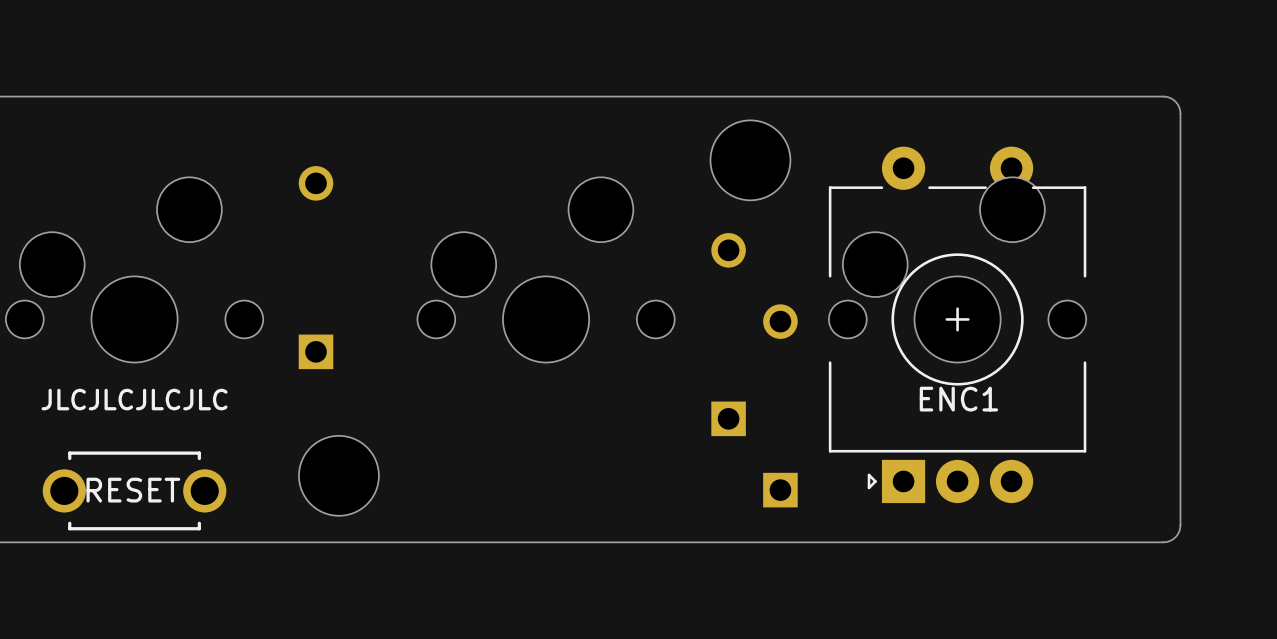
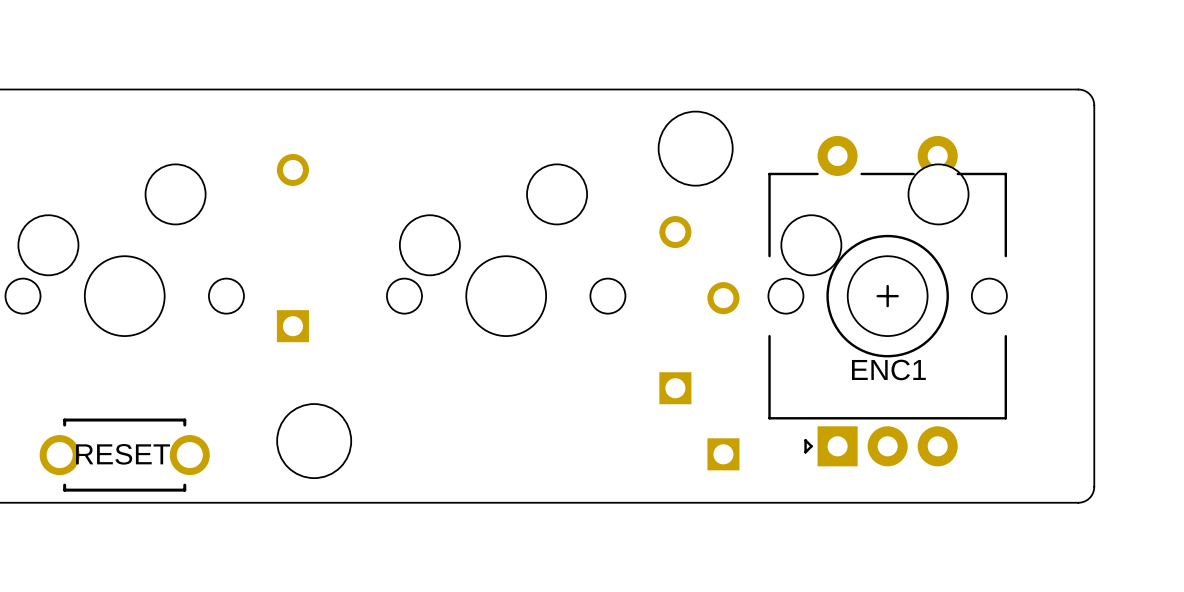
text: JLCJLCJLCJLC (134, 399) -> none

